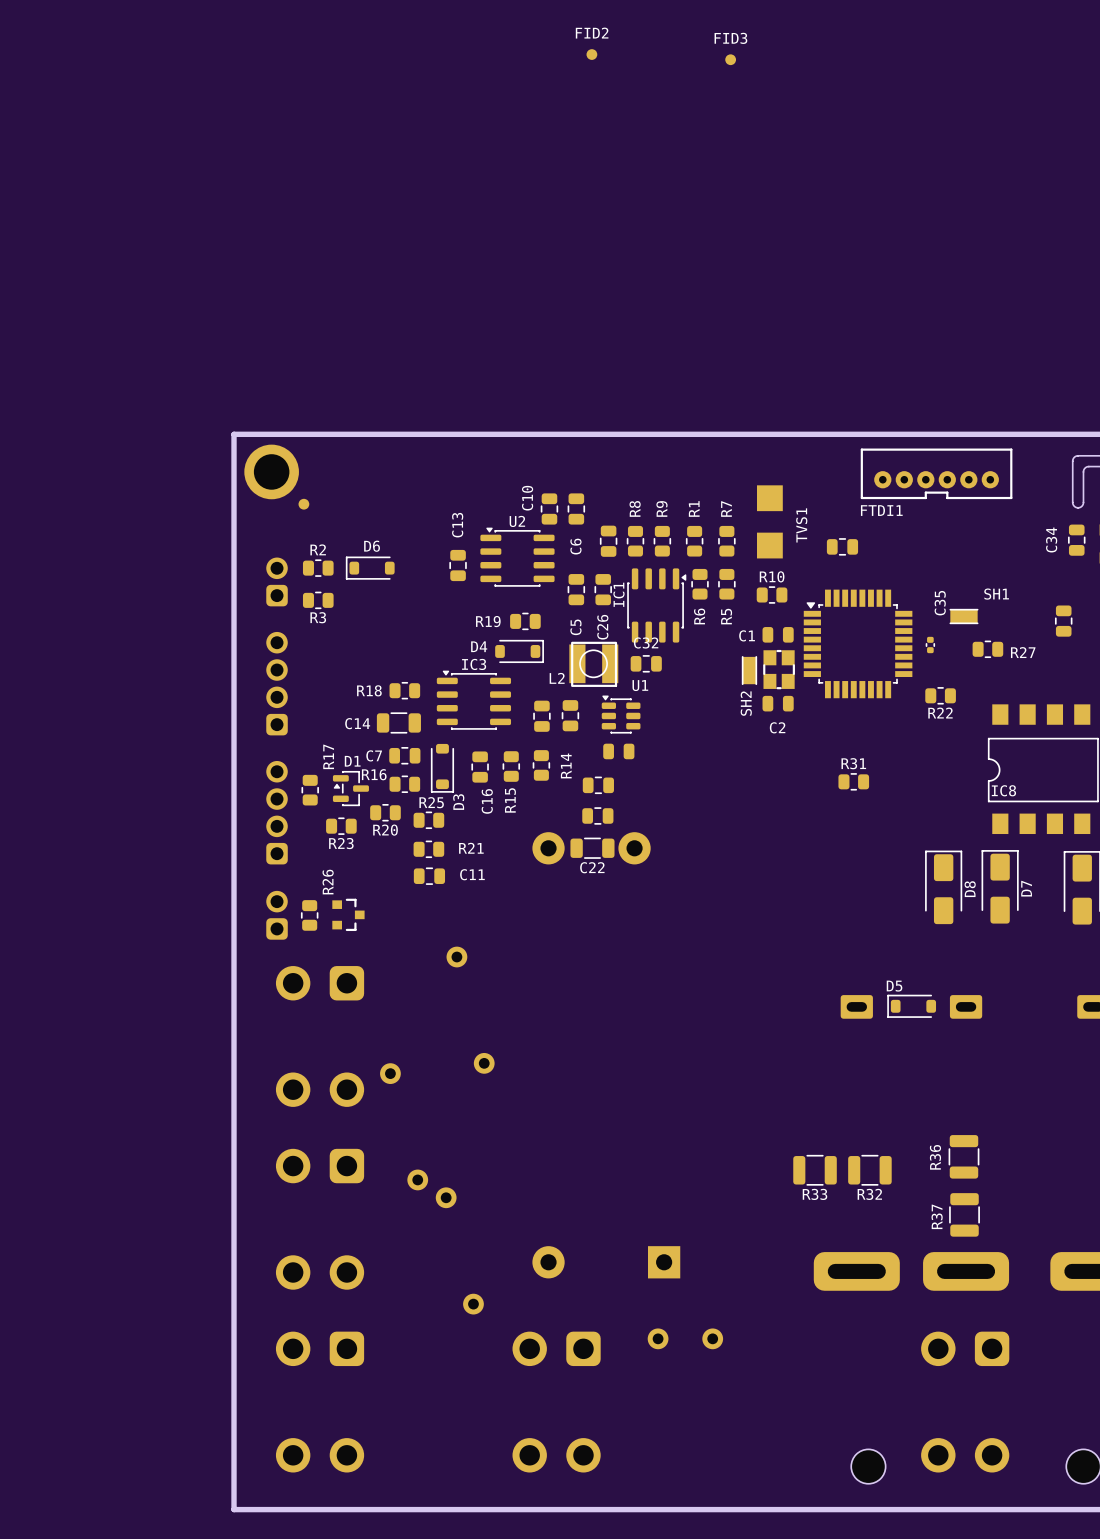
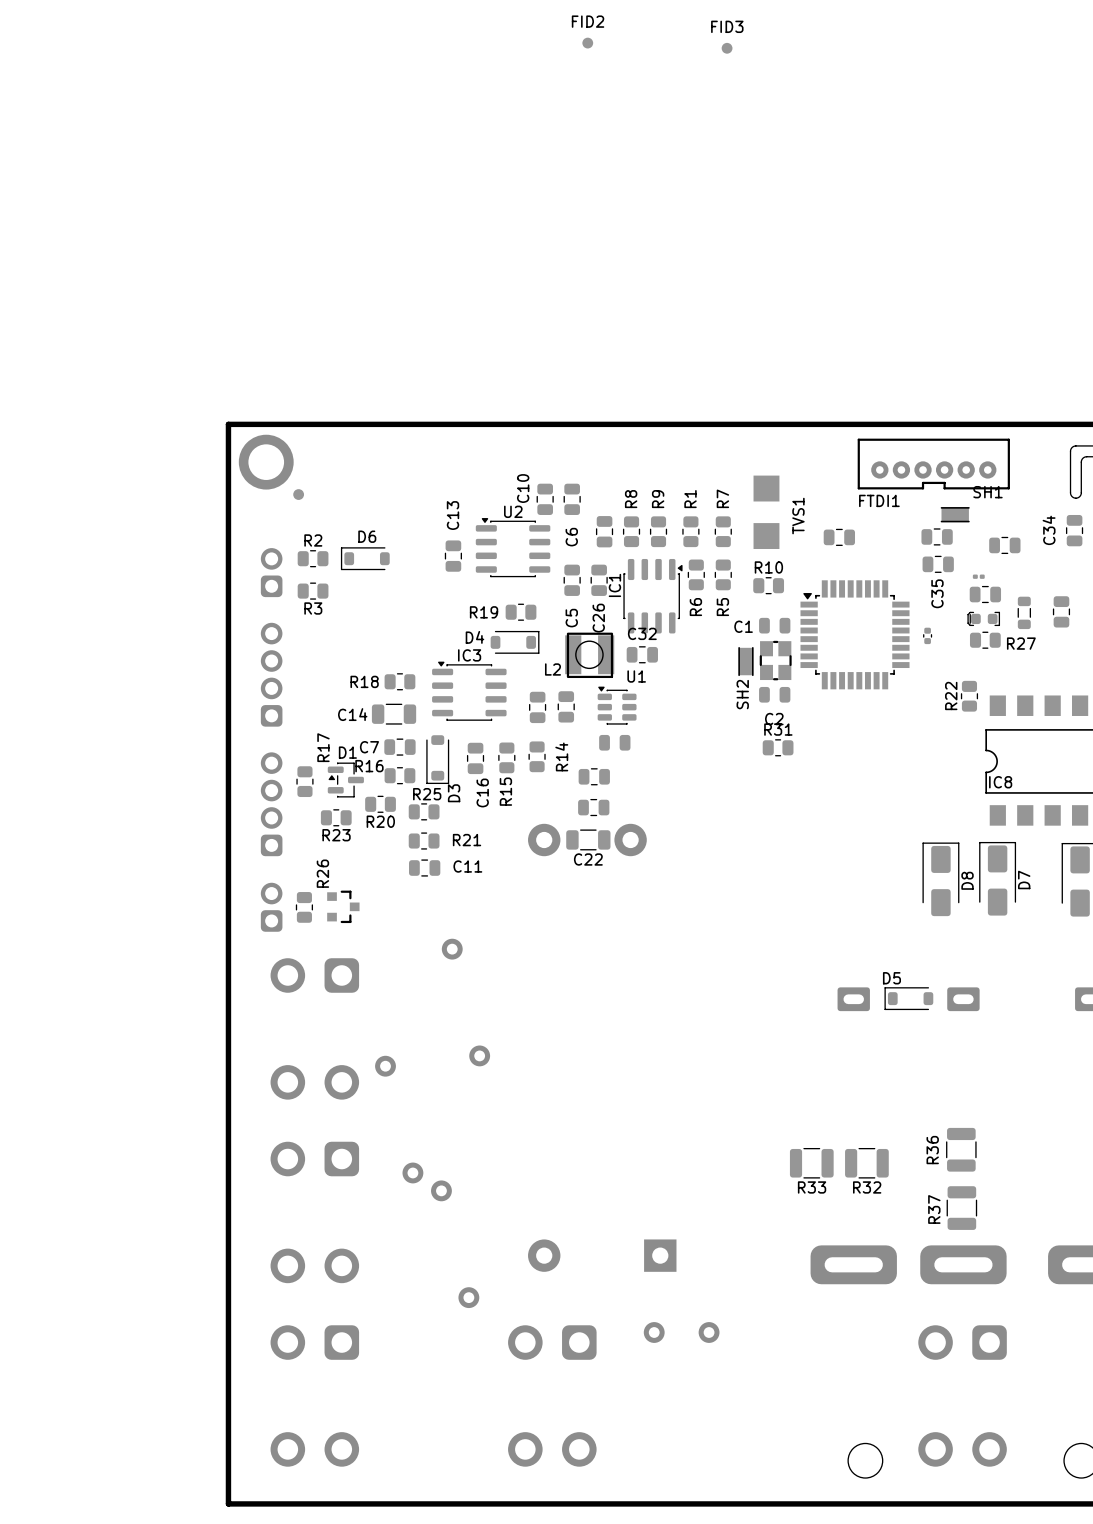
part: none -> (937, 536)
part: none -> (1004, 545)
part: none -> (938, 564)
part: none -> (978, 576)
part: none -> (985, 594)
SH1 position: (963, 616) -> (955, 514)
part: none -> (1024, 612)
part: none -> (983, 618)
R22 rotation: 0° (940, 695) -> 90° clockwise (969, 696)
R22 position: (940, 695) -> (969, 696)
R31 position: (853, 781) -> (778, 747)

